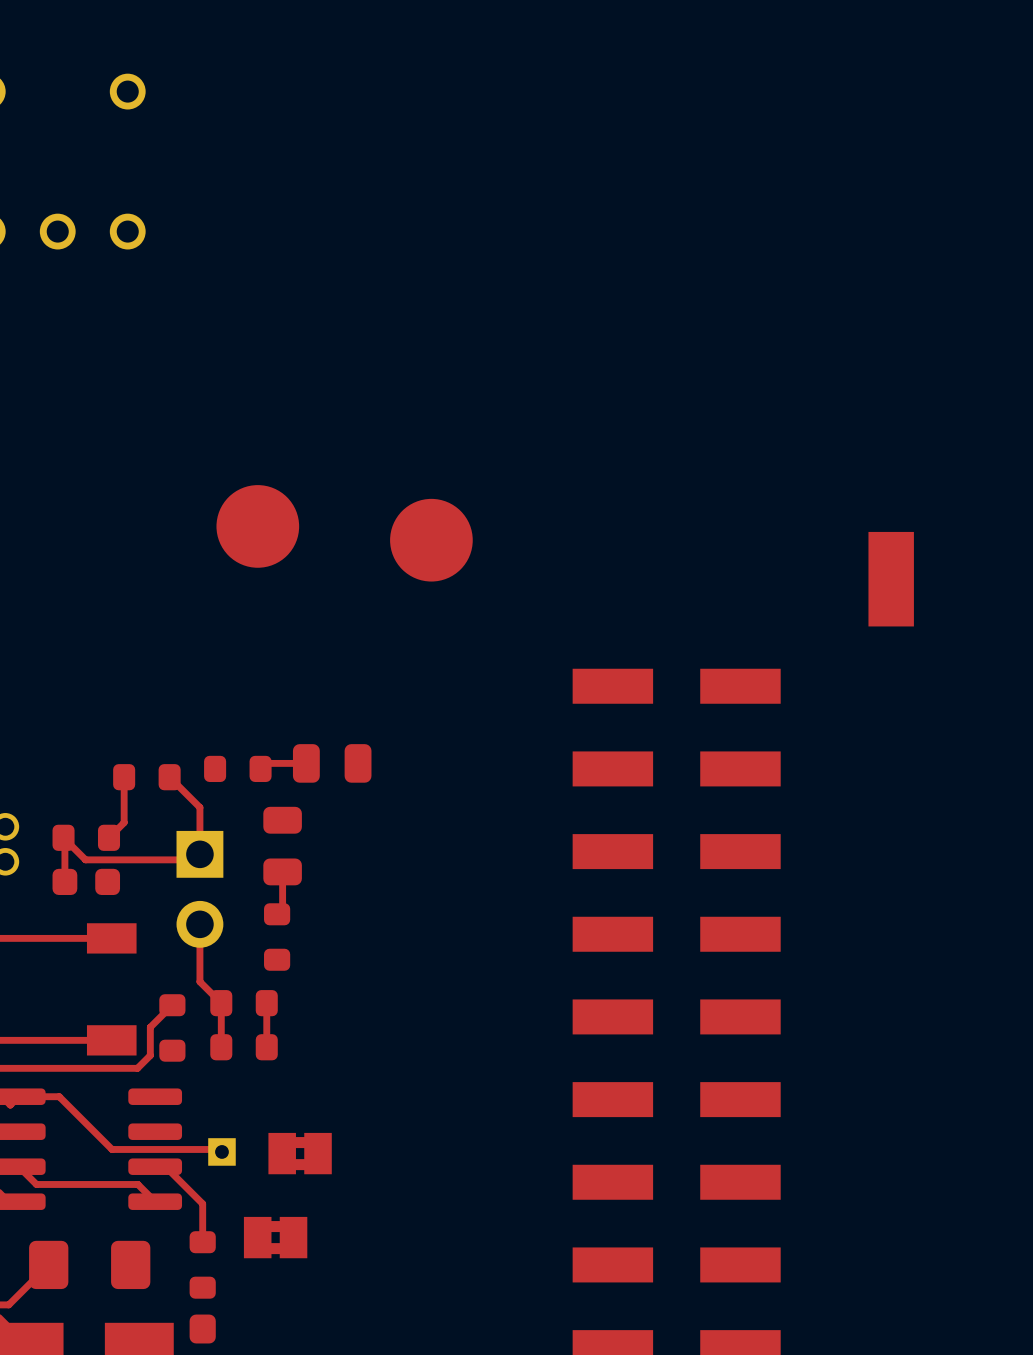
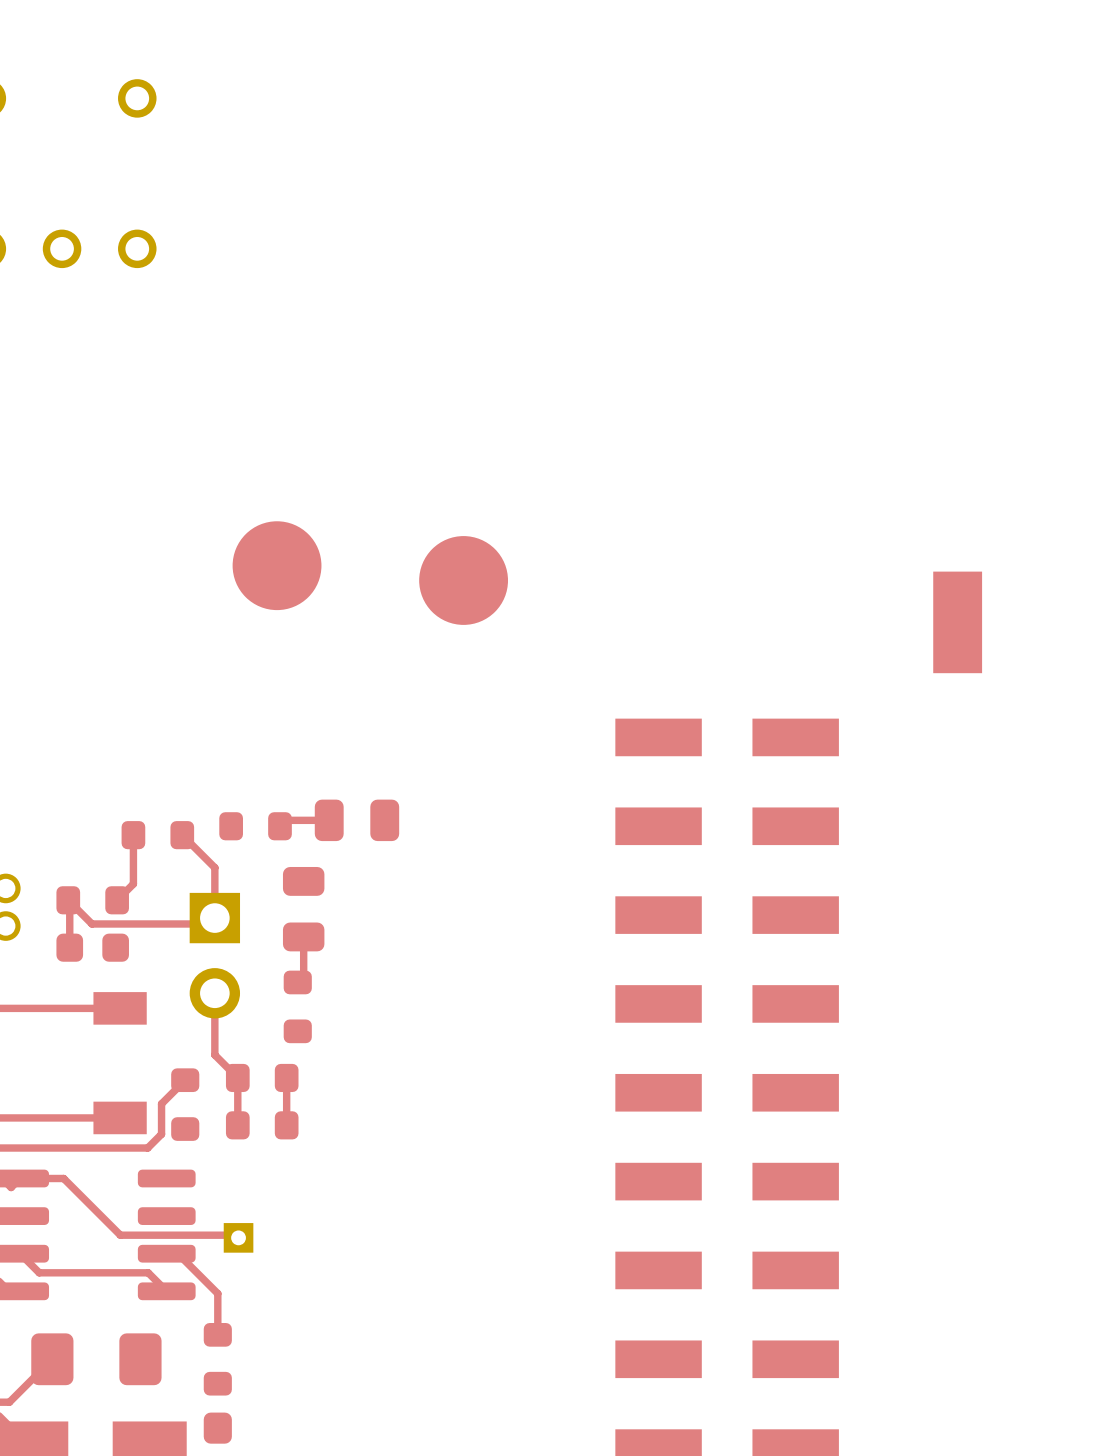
part: (300, 1153) -> none
part: (275, 1237) -> none

